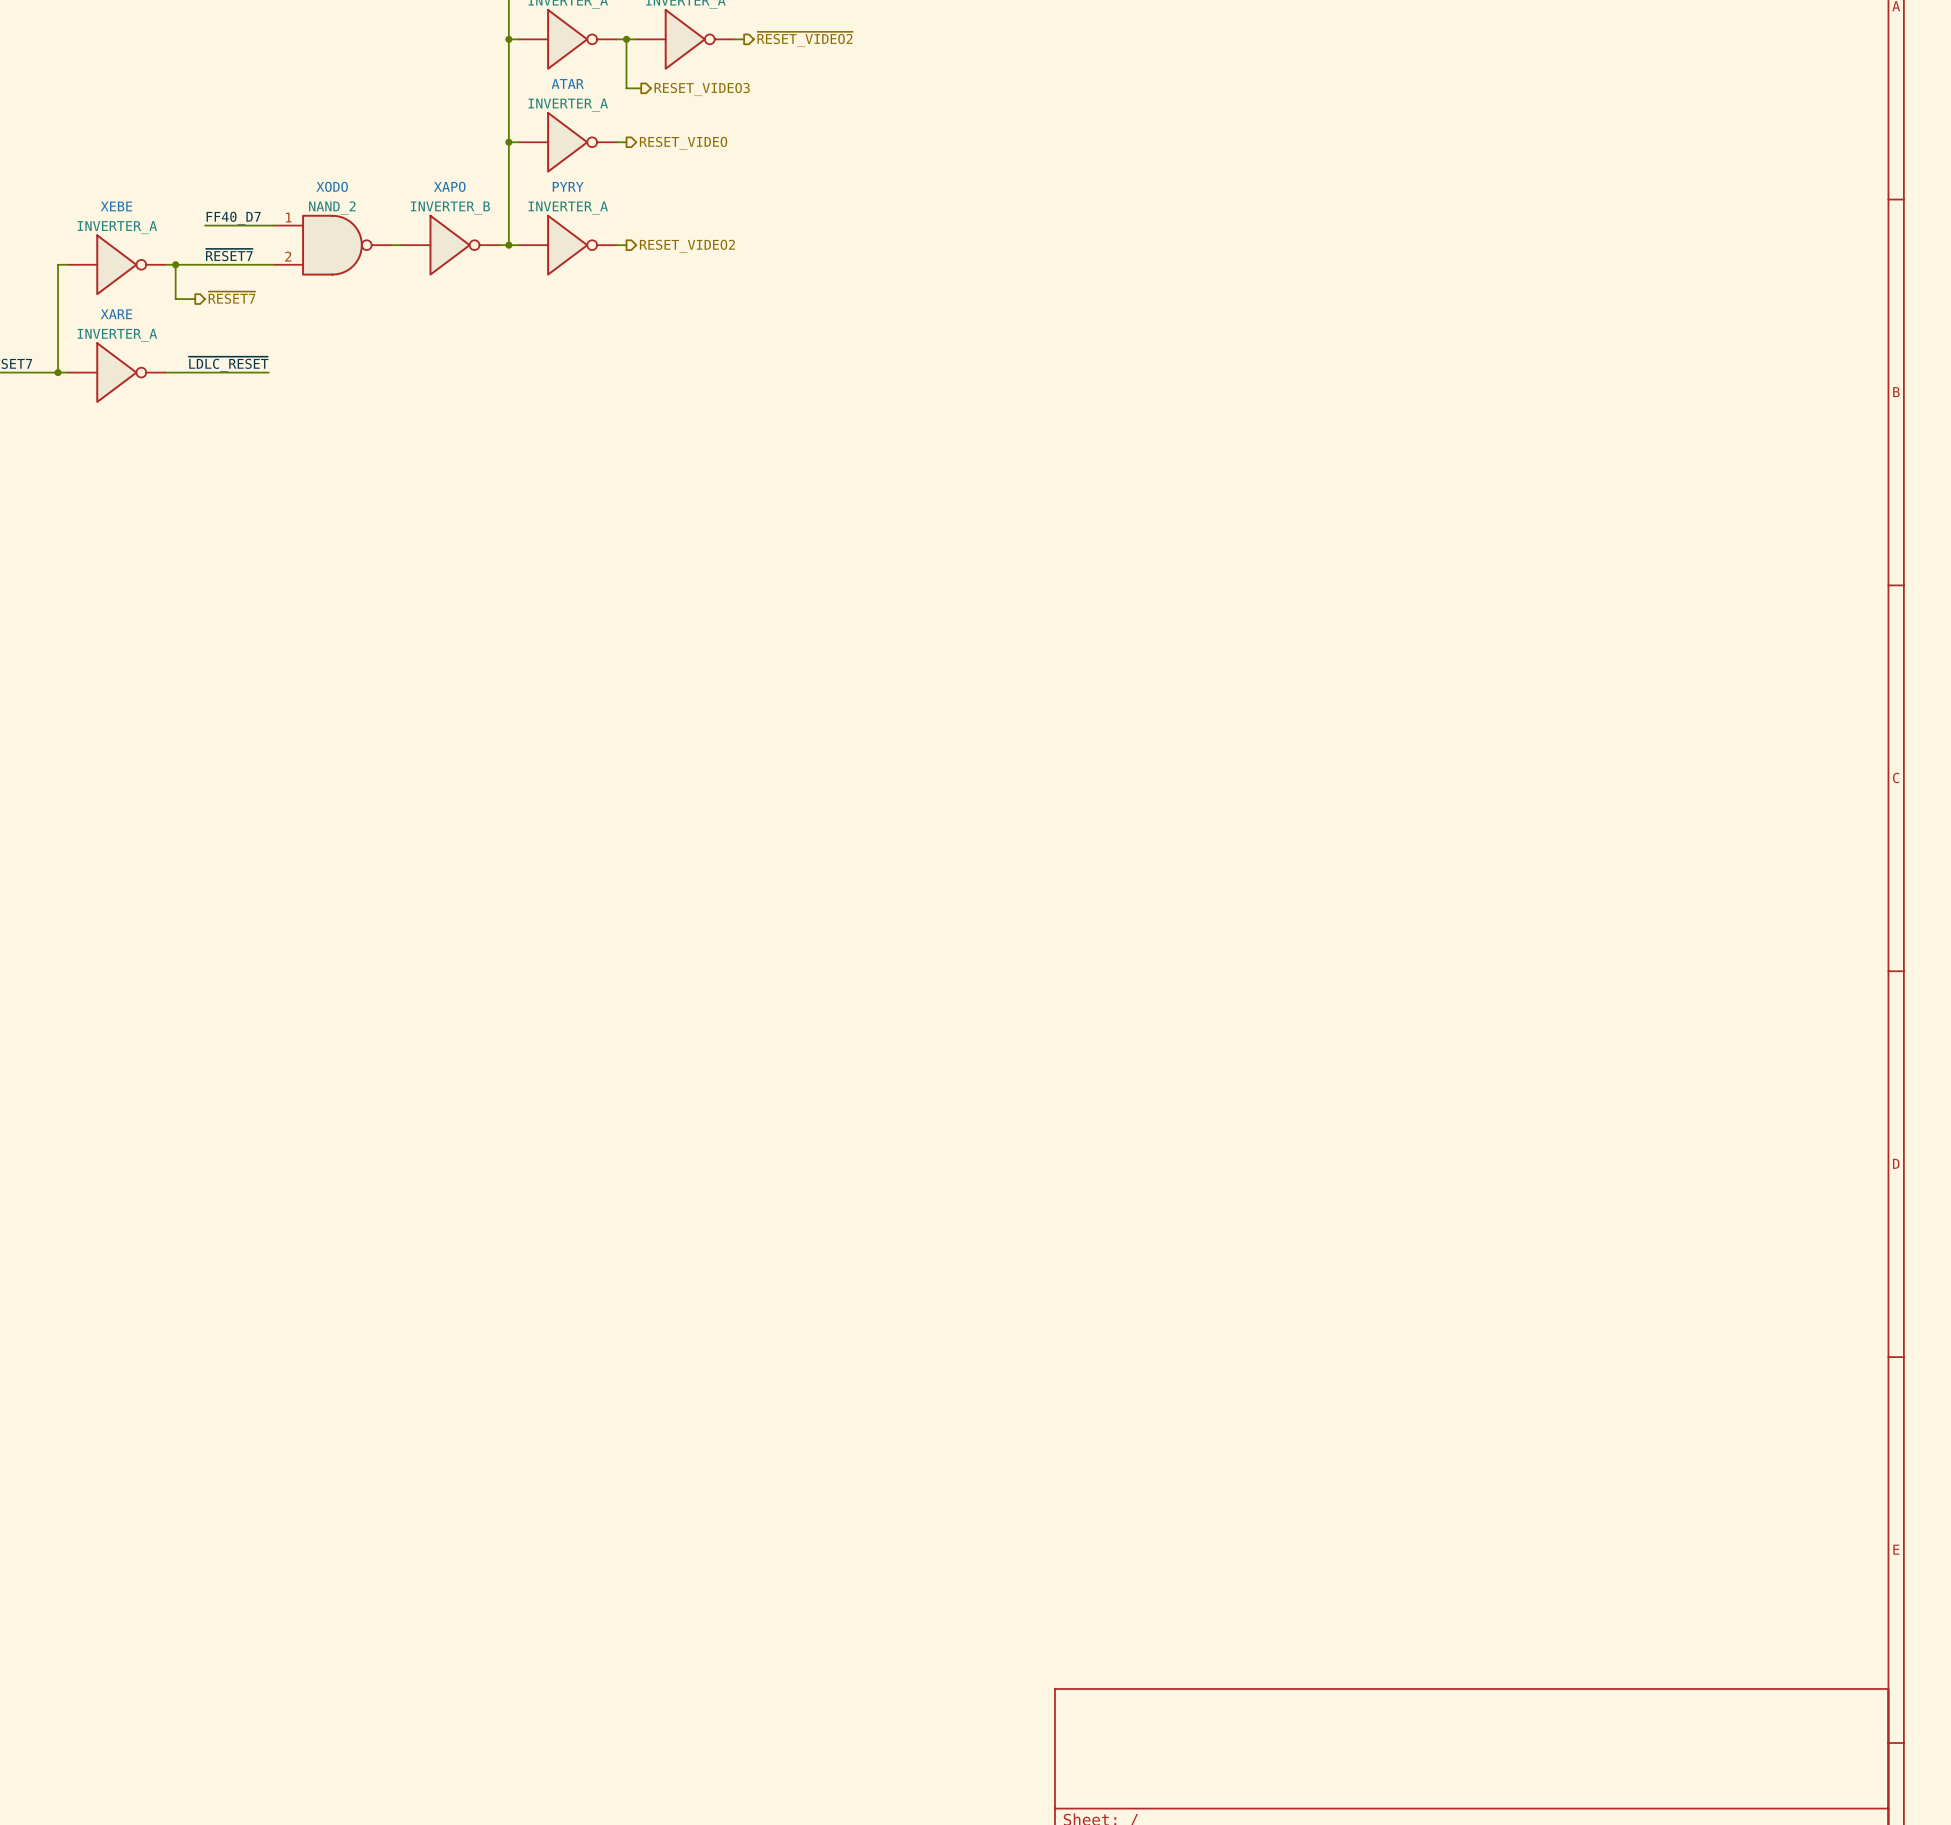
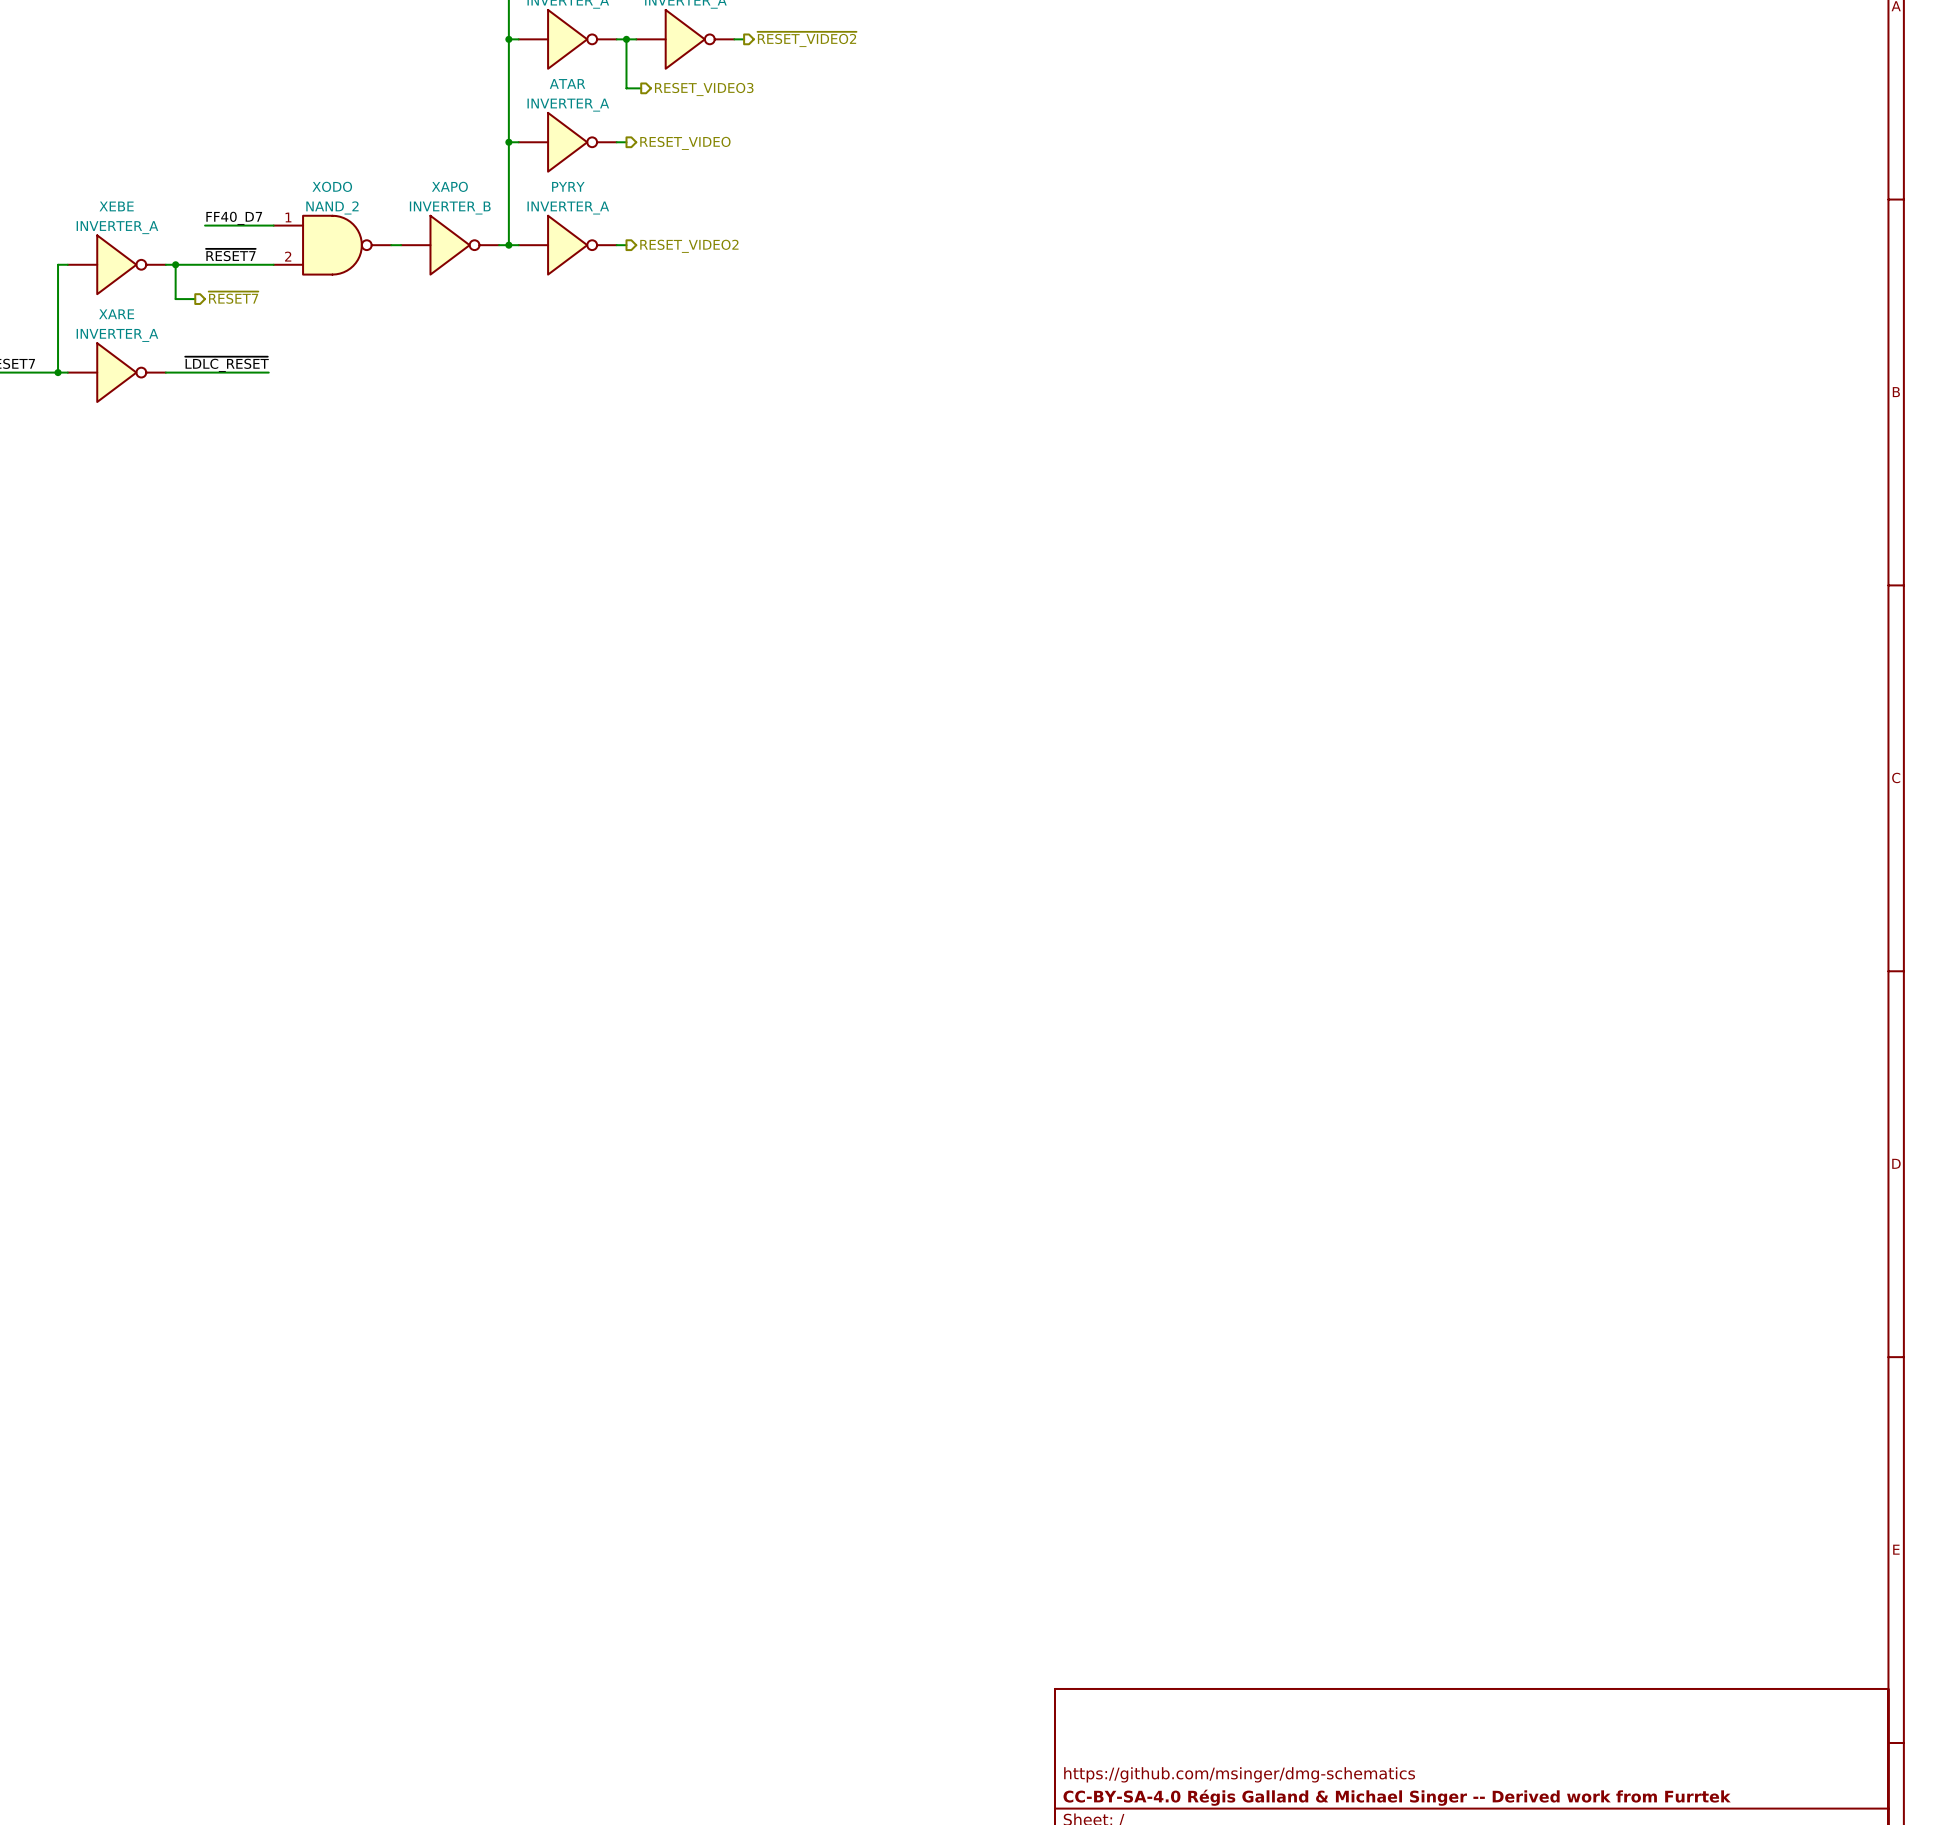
title block: none -> https://github.com/msinger/dmg-schematics (1239, 1774)
title block: none -> CC-BY-SA-4.0 Régis Galland & Michael Singer -- Derived work from Furrtek (1397, 1797)

